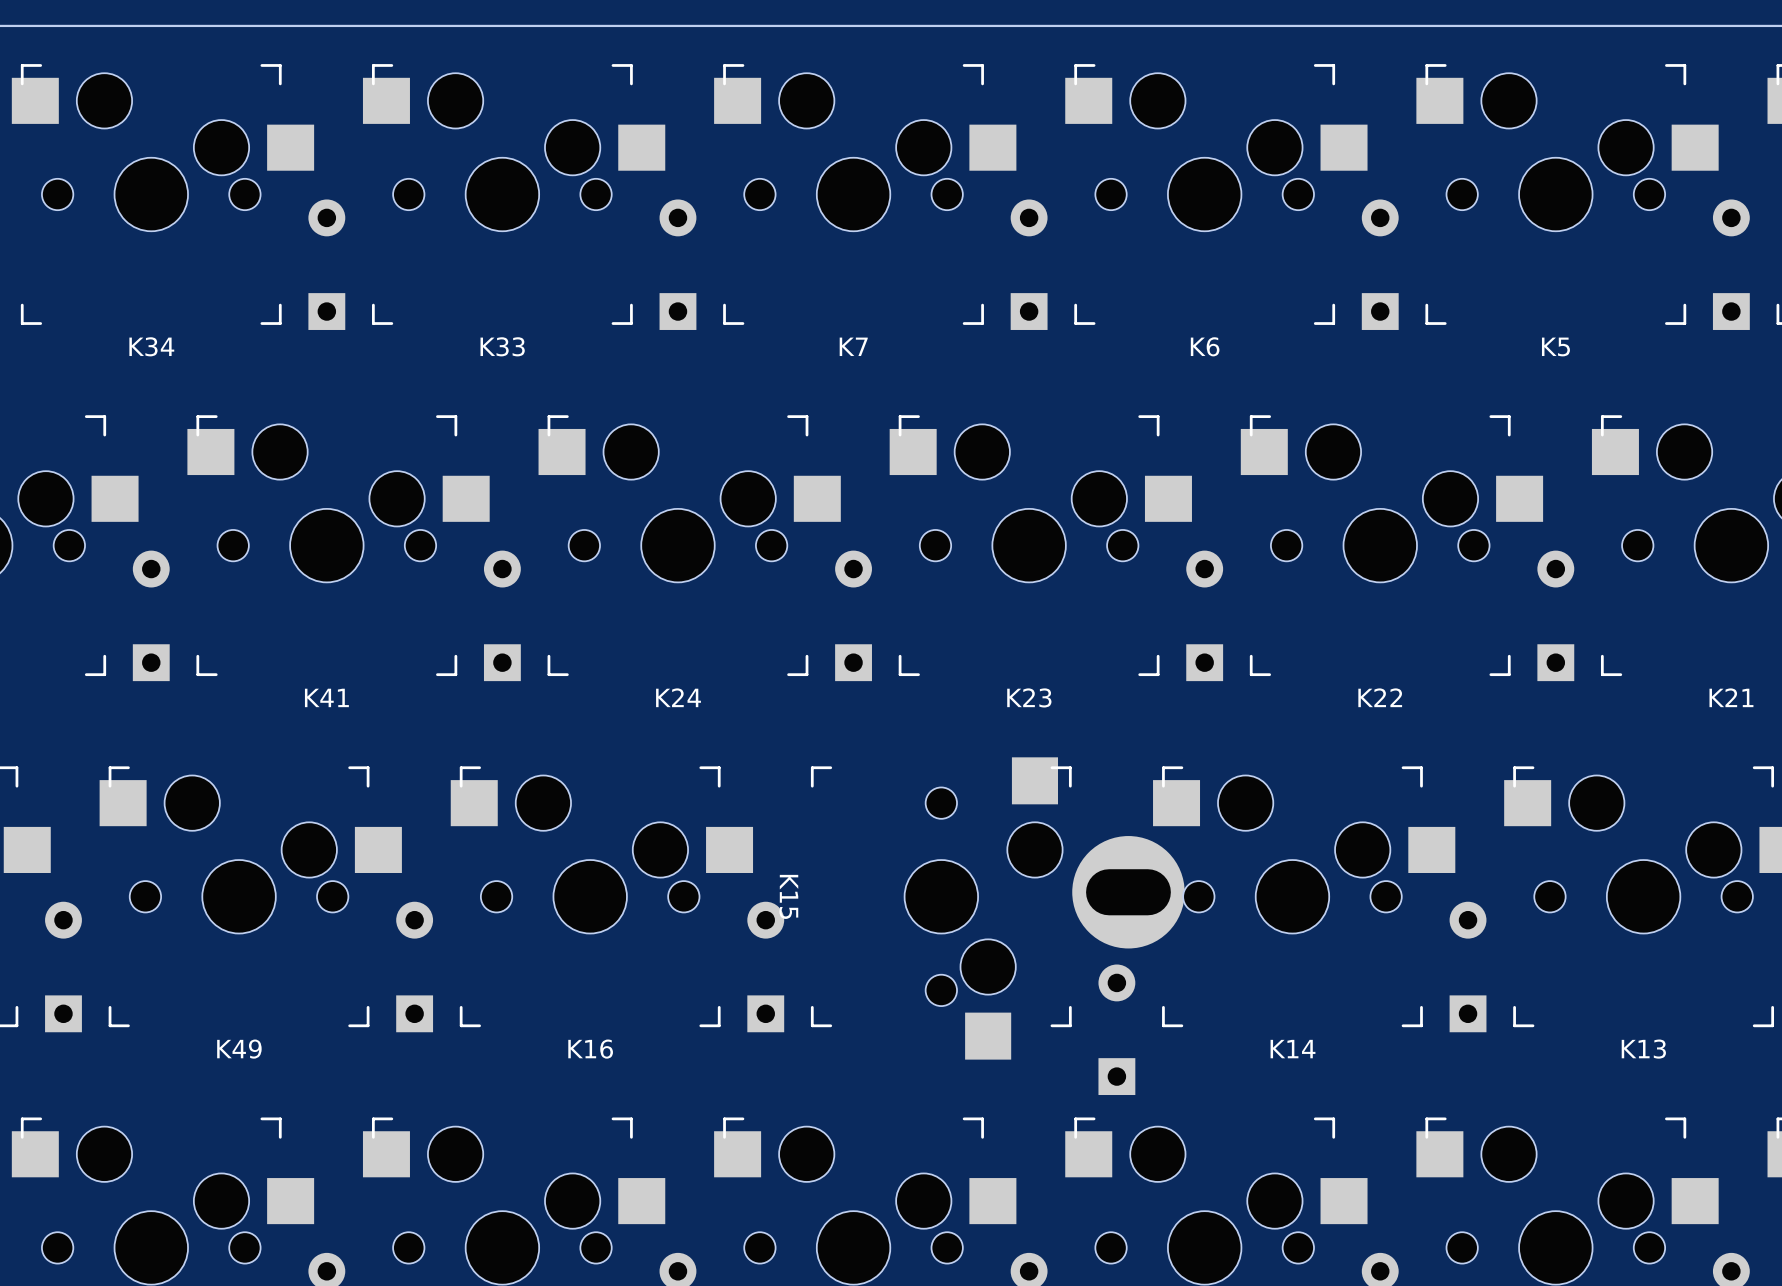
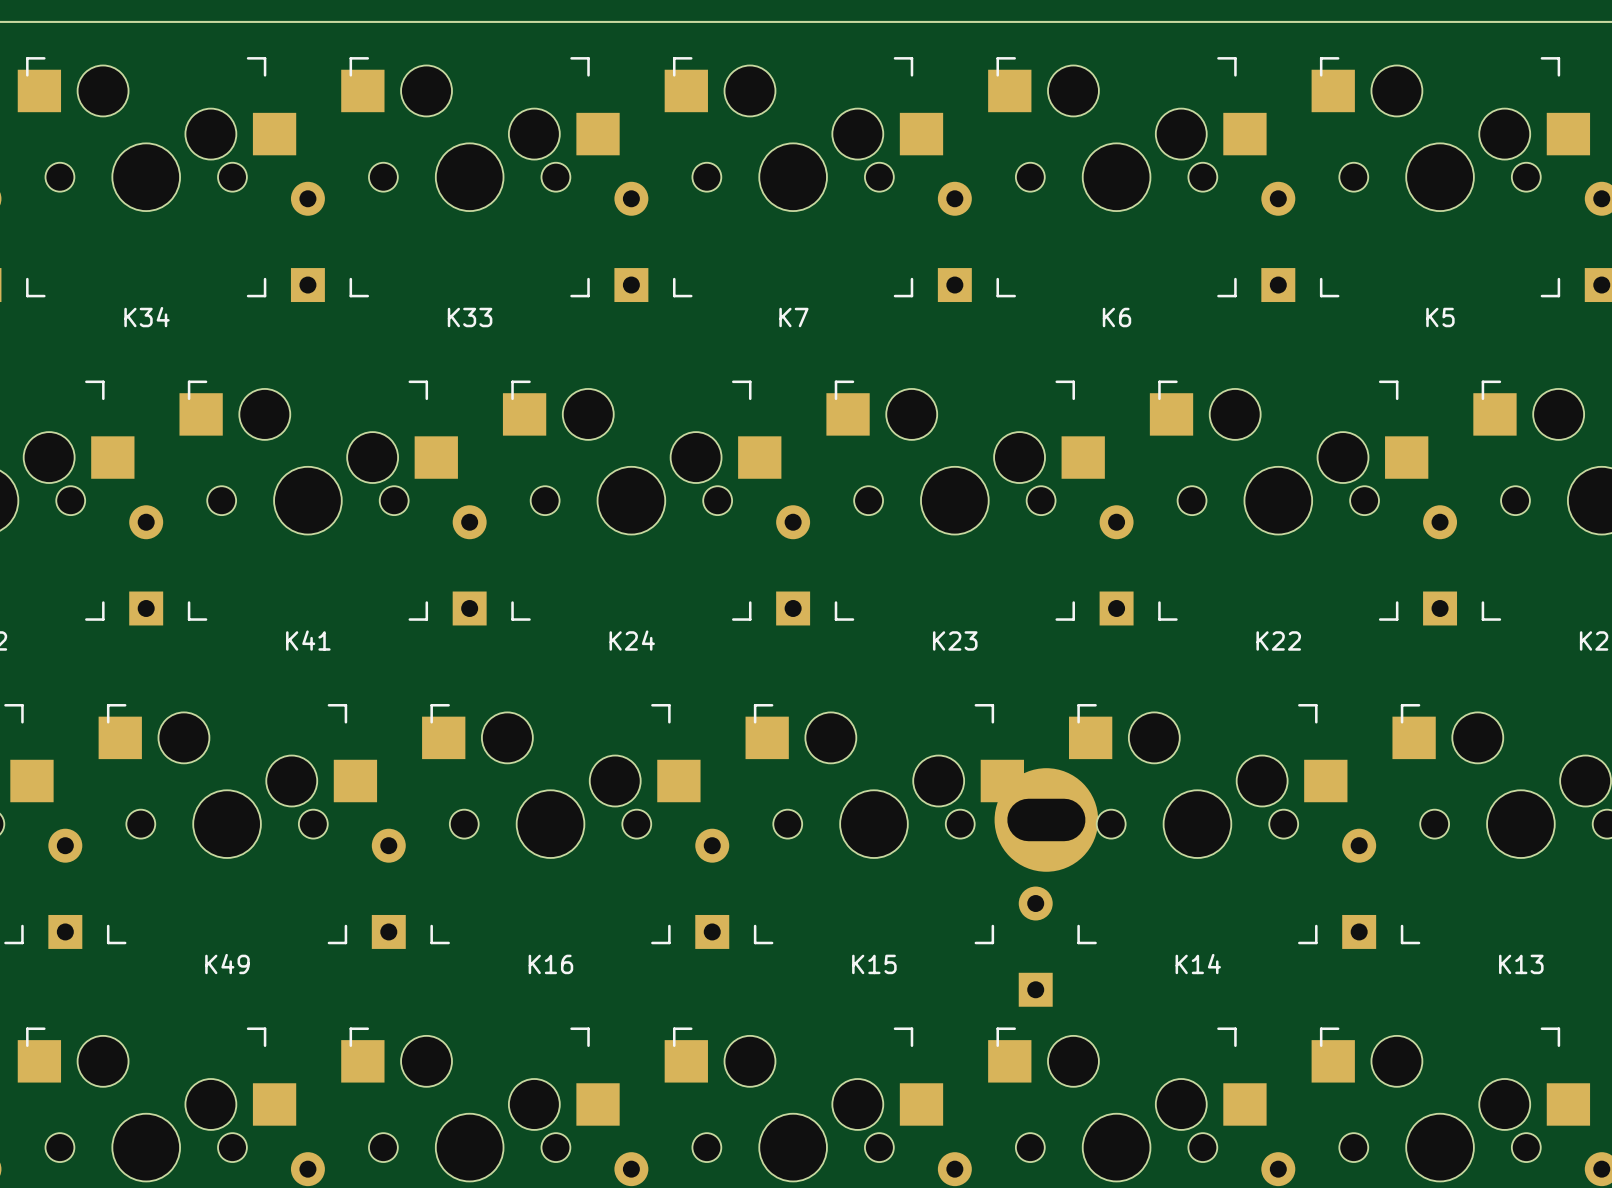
K15 rotation: 0° (941, 908) -> 90° counterclockwise (884, 824)

